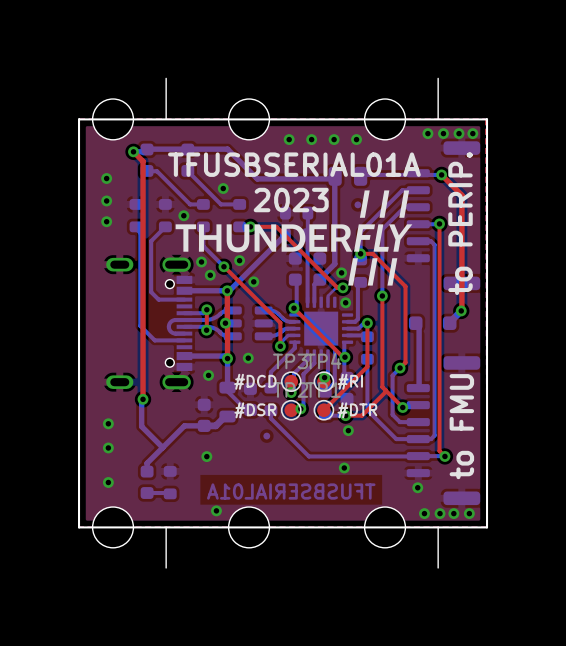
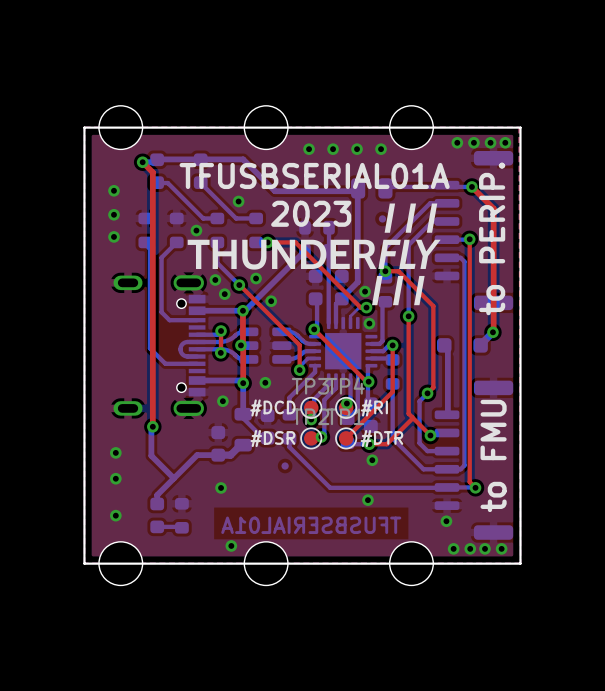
board edge: (166, 78) (166, 119) -> none
board edge: (438, 78) (438, 119) -> none
board edge: (166, 527) (166, 567) -> none
board edge: (438, 527) (438, 567) -> none

